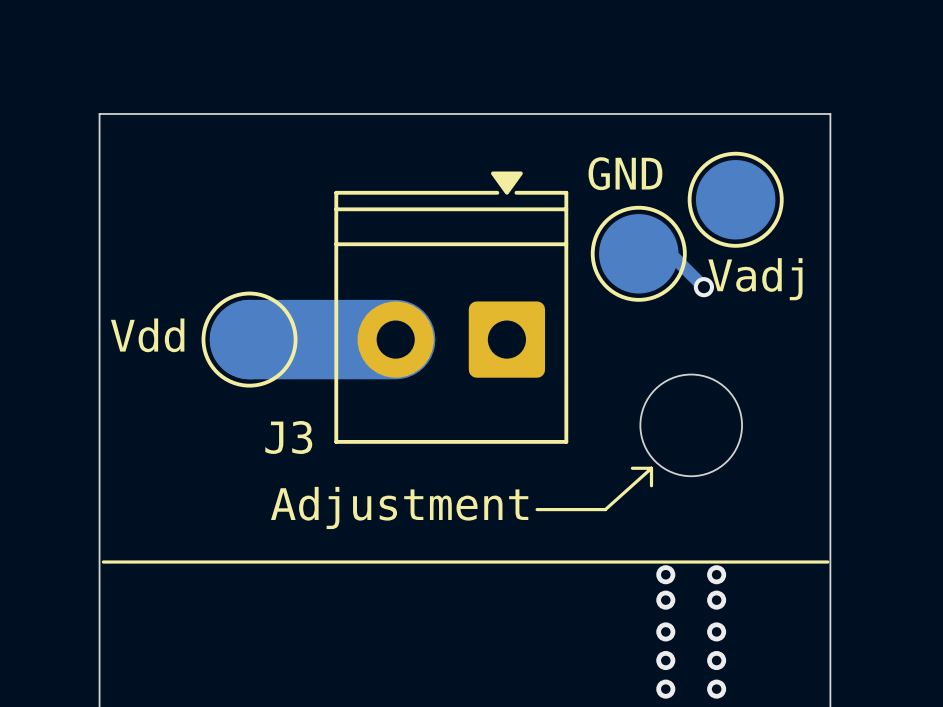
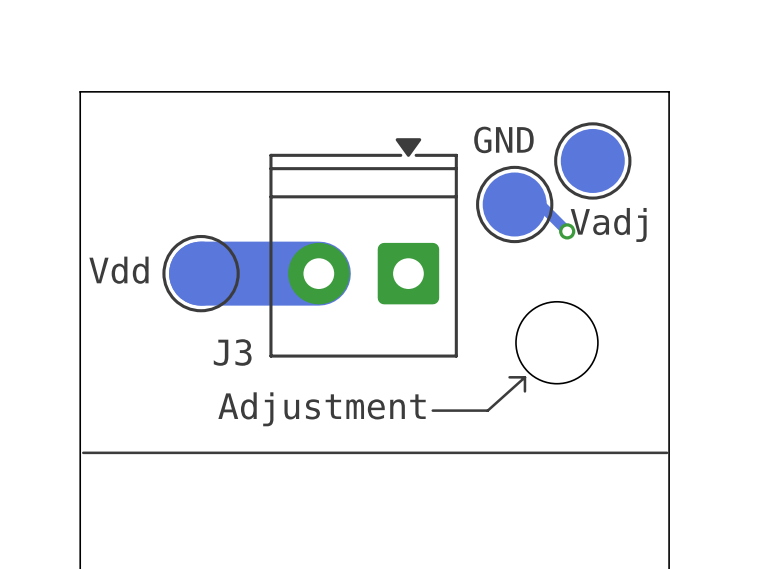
via: (665, 574) -> none
via: (716, 574) -> none
via: (665, 600) -> none
via: (716, 600) -> none
via: (665, 631) -> none
via: (716, 631) -> none
via: (665, 660) -> none
via: (716, 660) -> none
via: (665, 689) -> none
via: (716, 689) -> none

